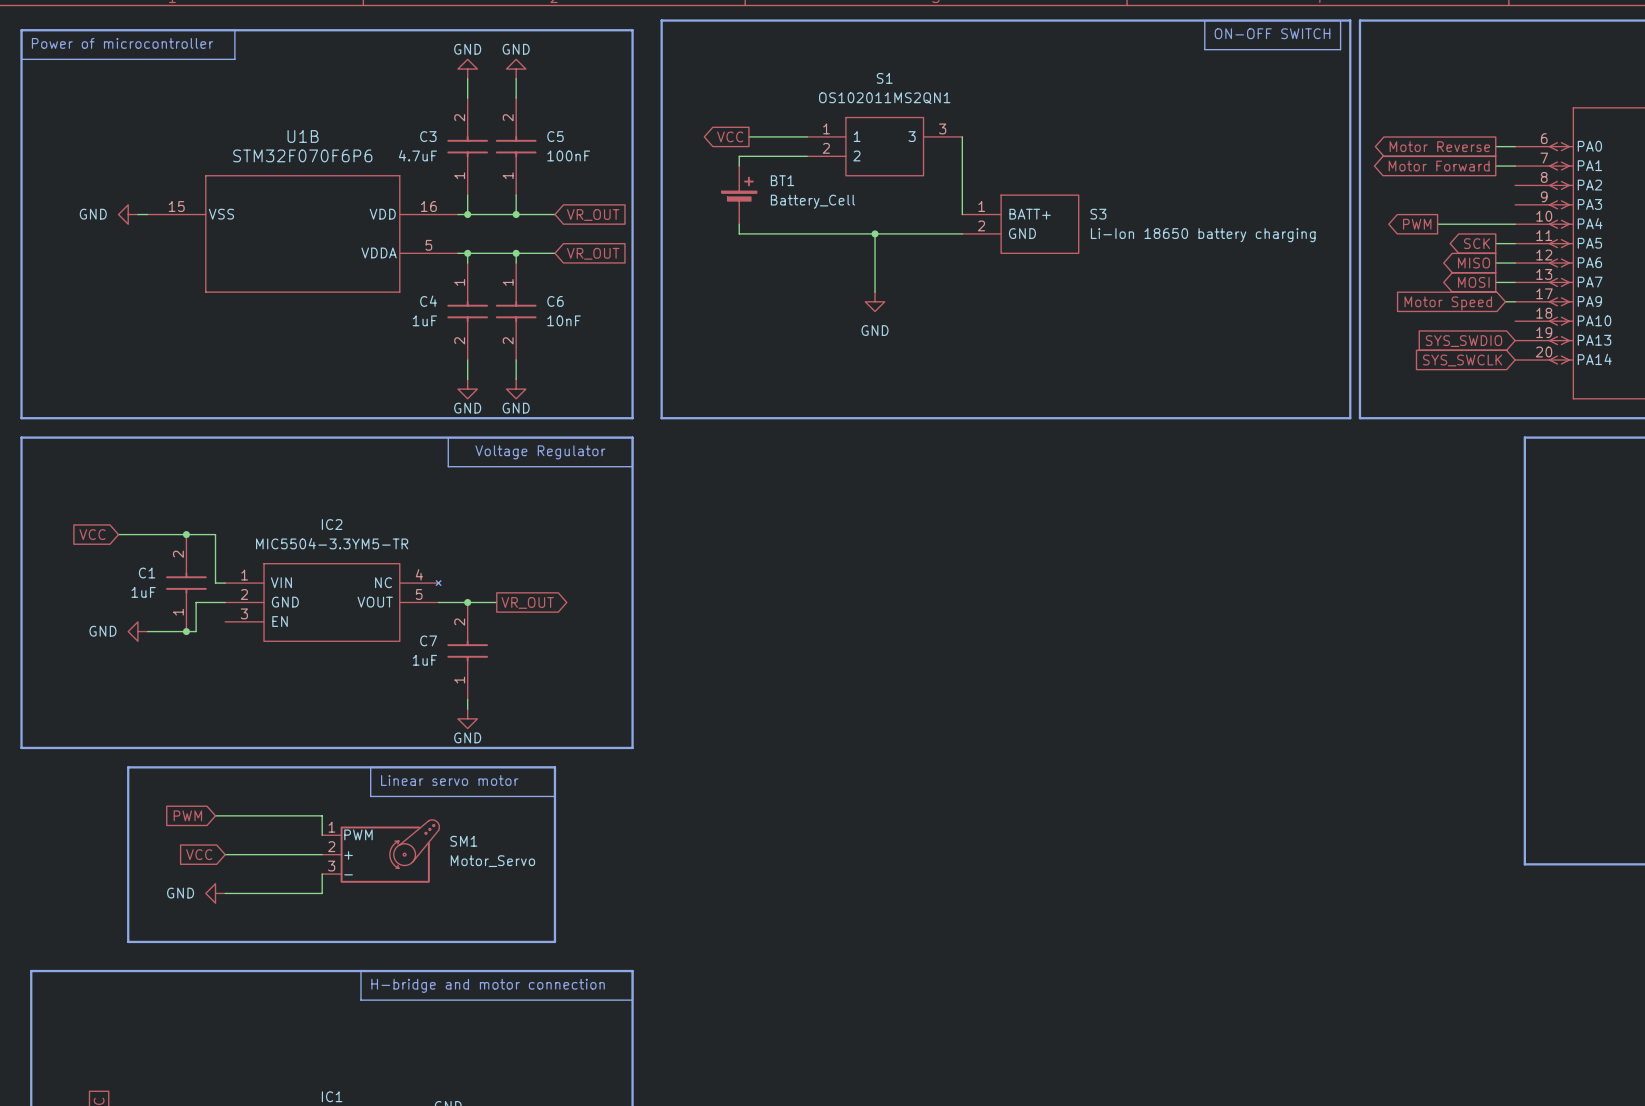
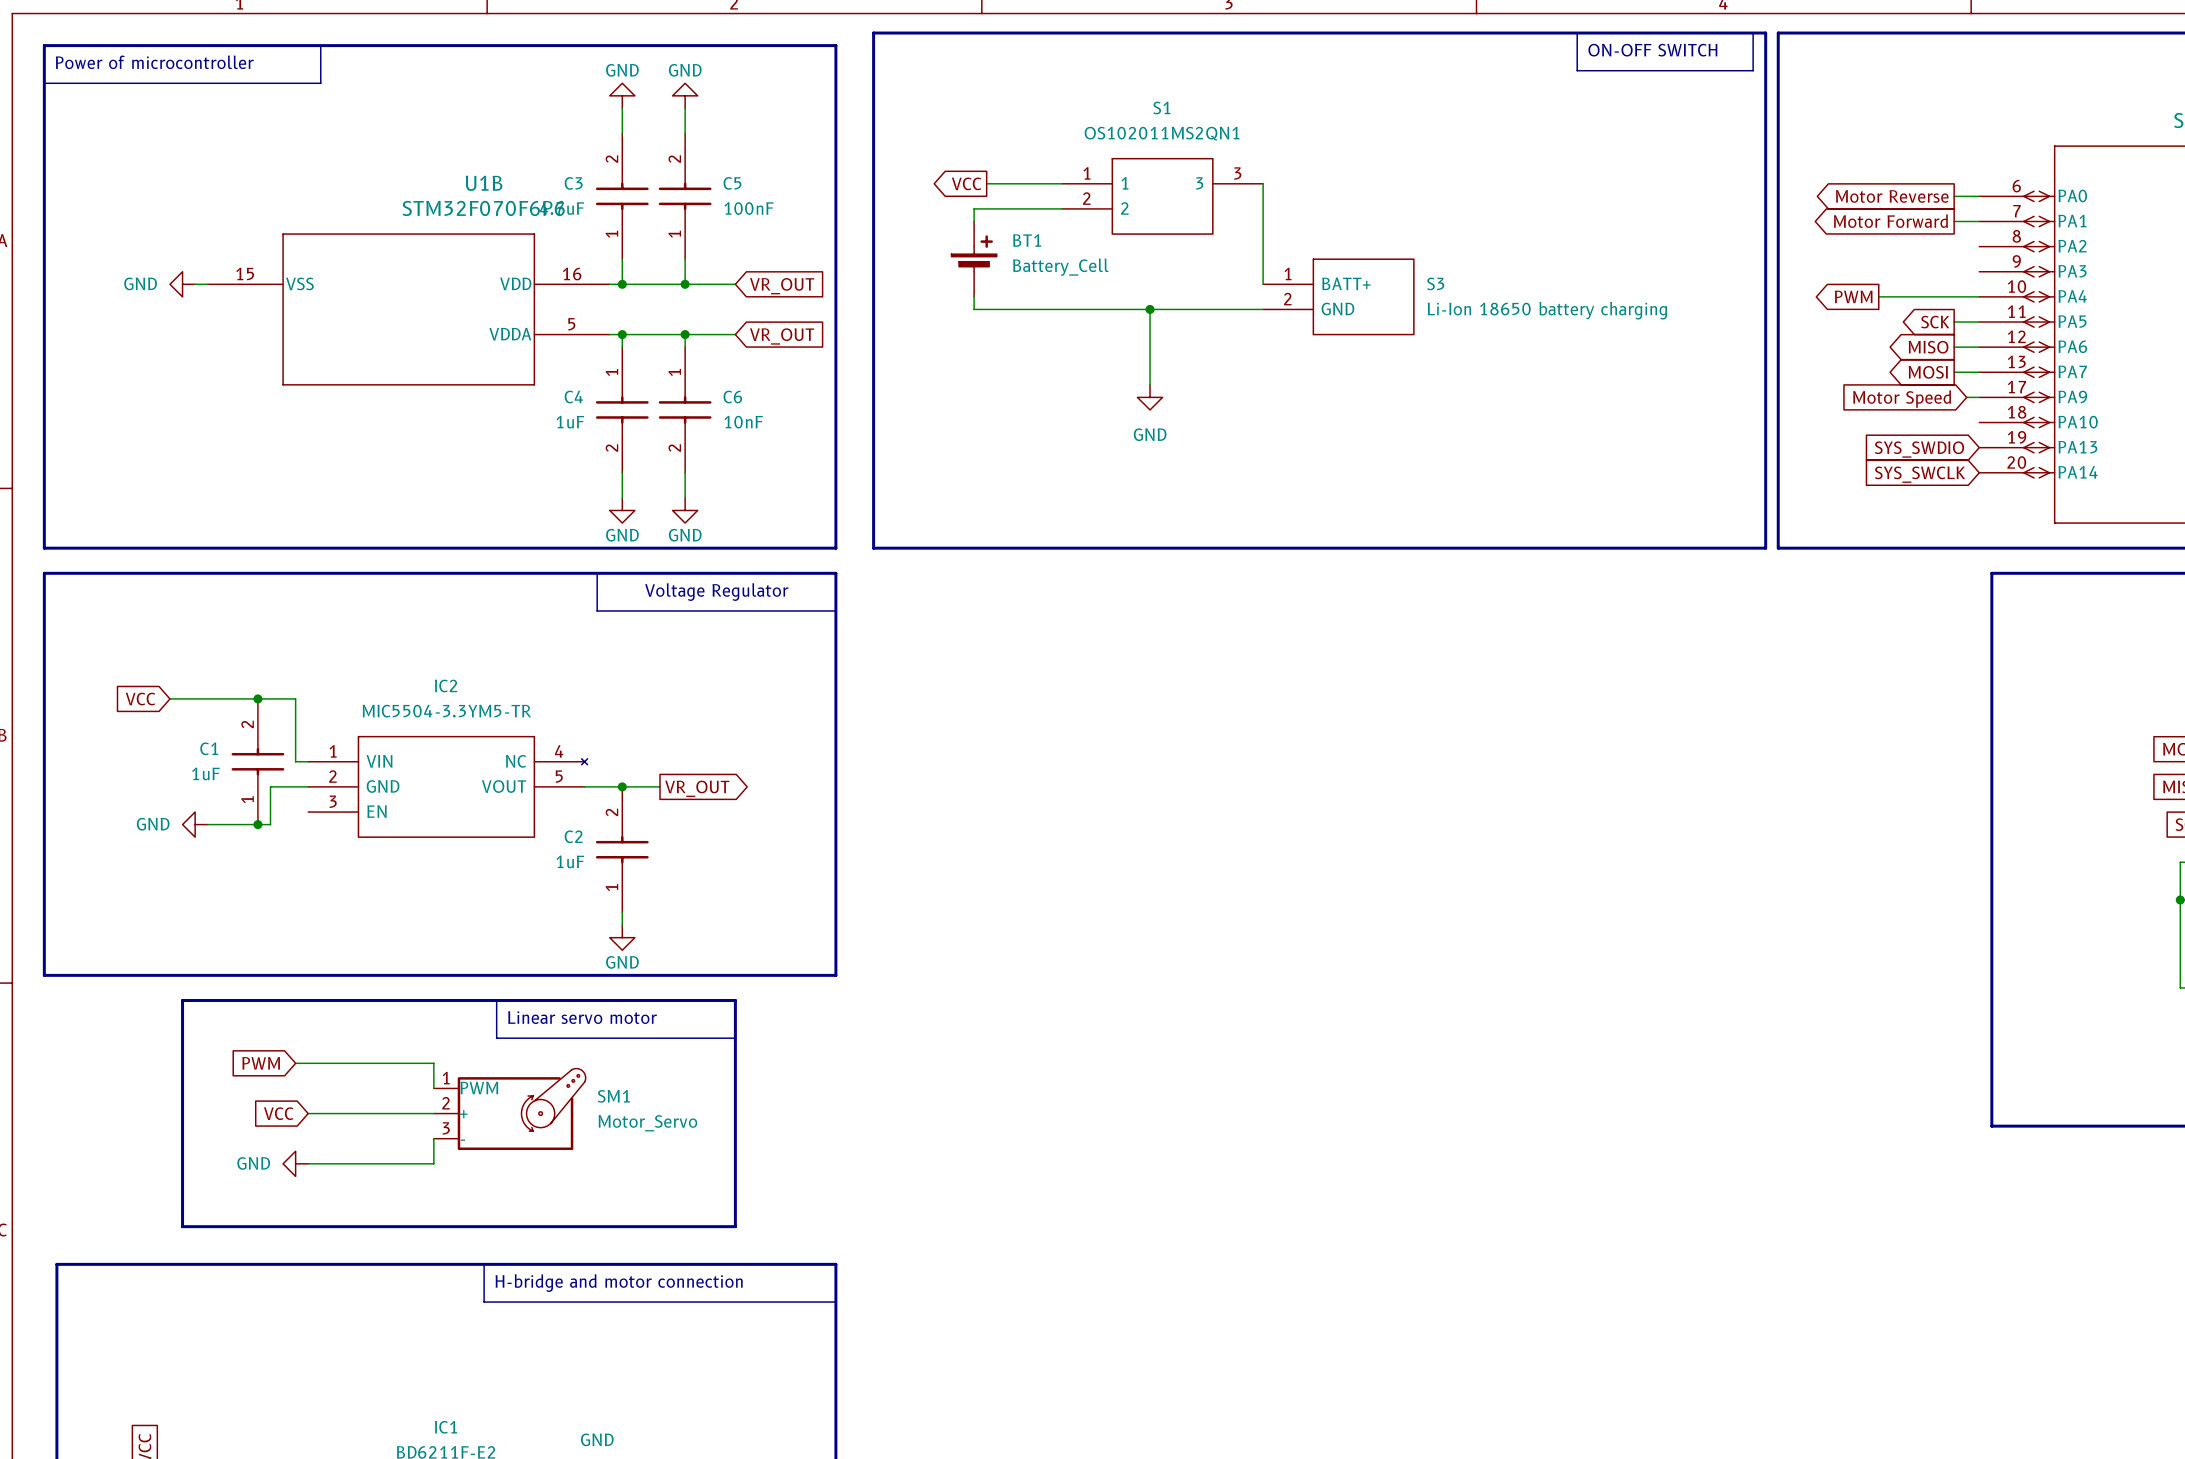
U1B name position: U1B (303, 136) -> U1B (484, 183)
U1B value position: STM32F070F6P6 (302, 155) -> STM32F070F6P6 (483, 208)
C7 name: C7 (428, 640) -> C2 (573, 836)

